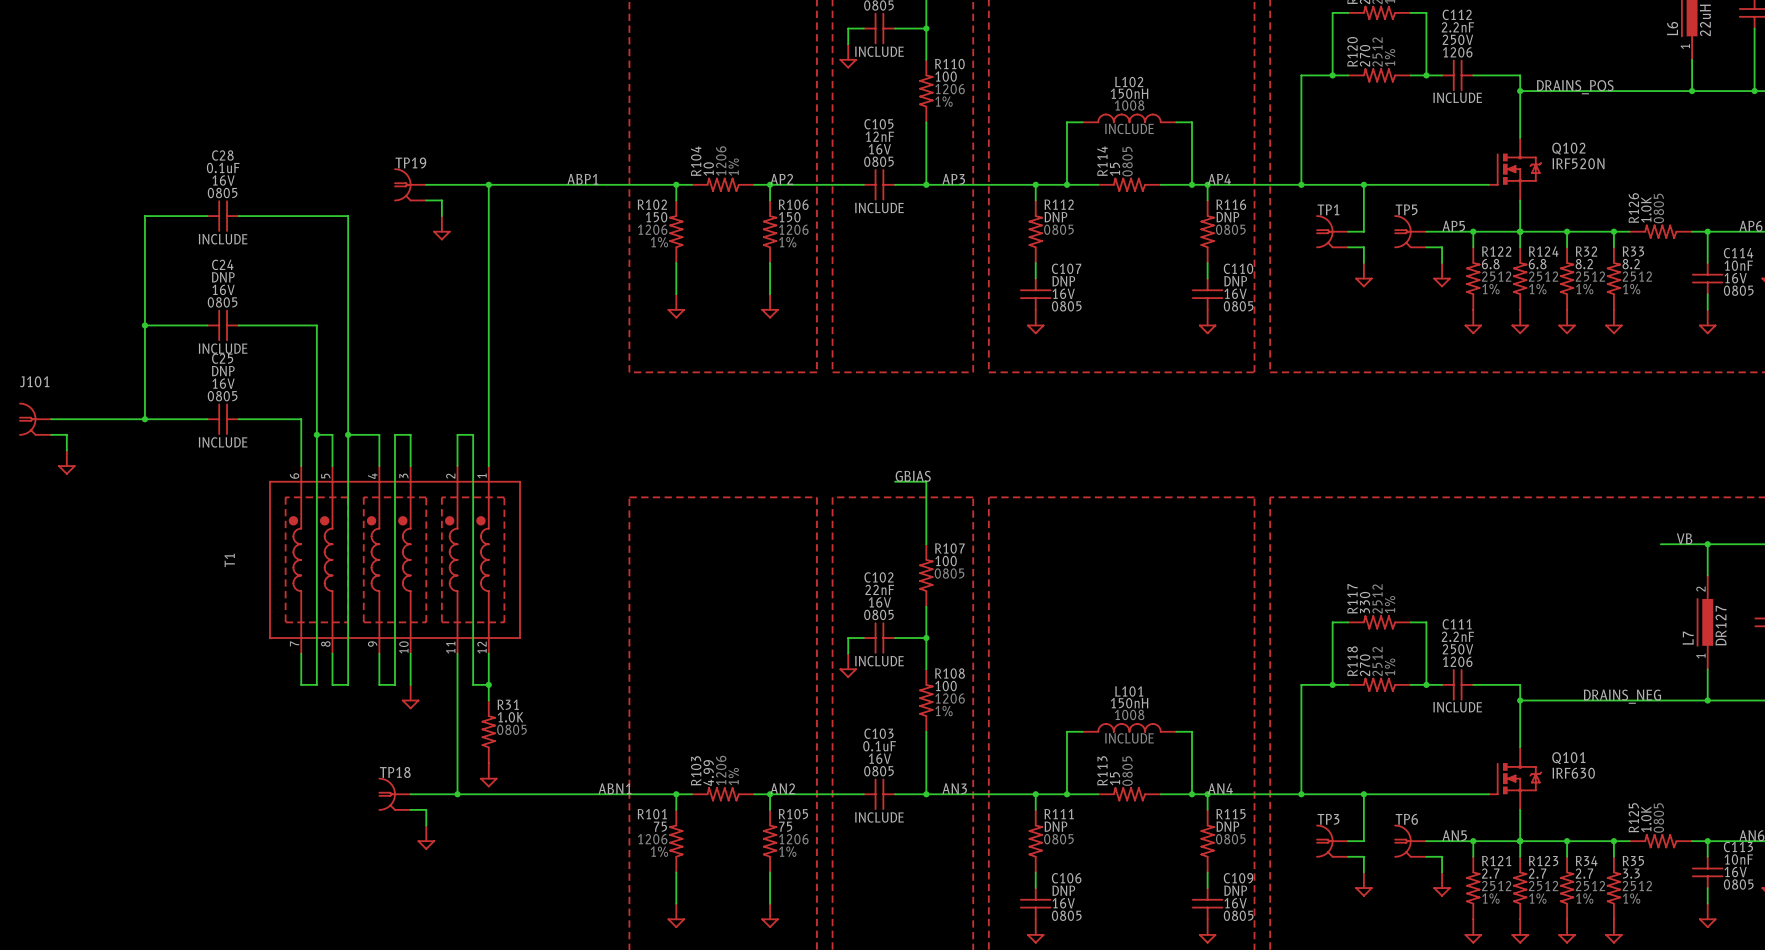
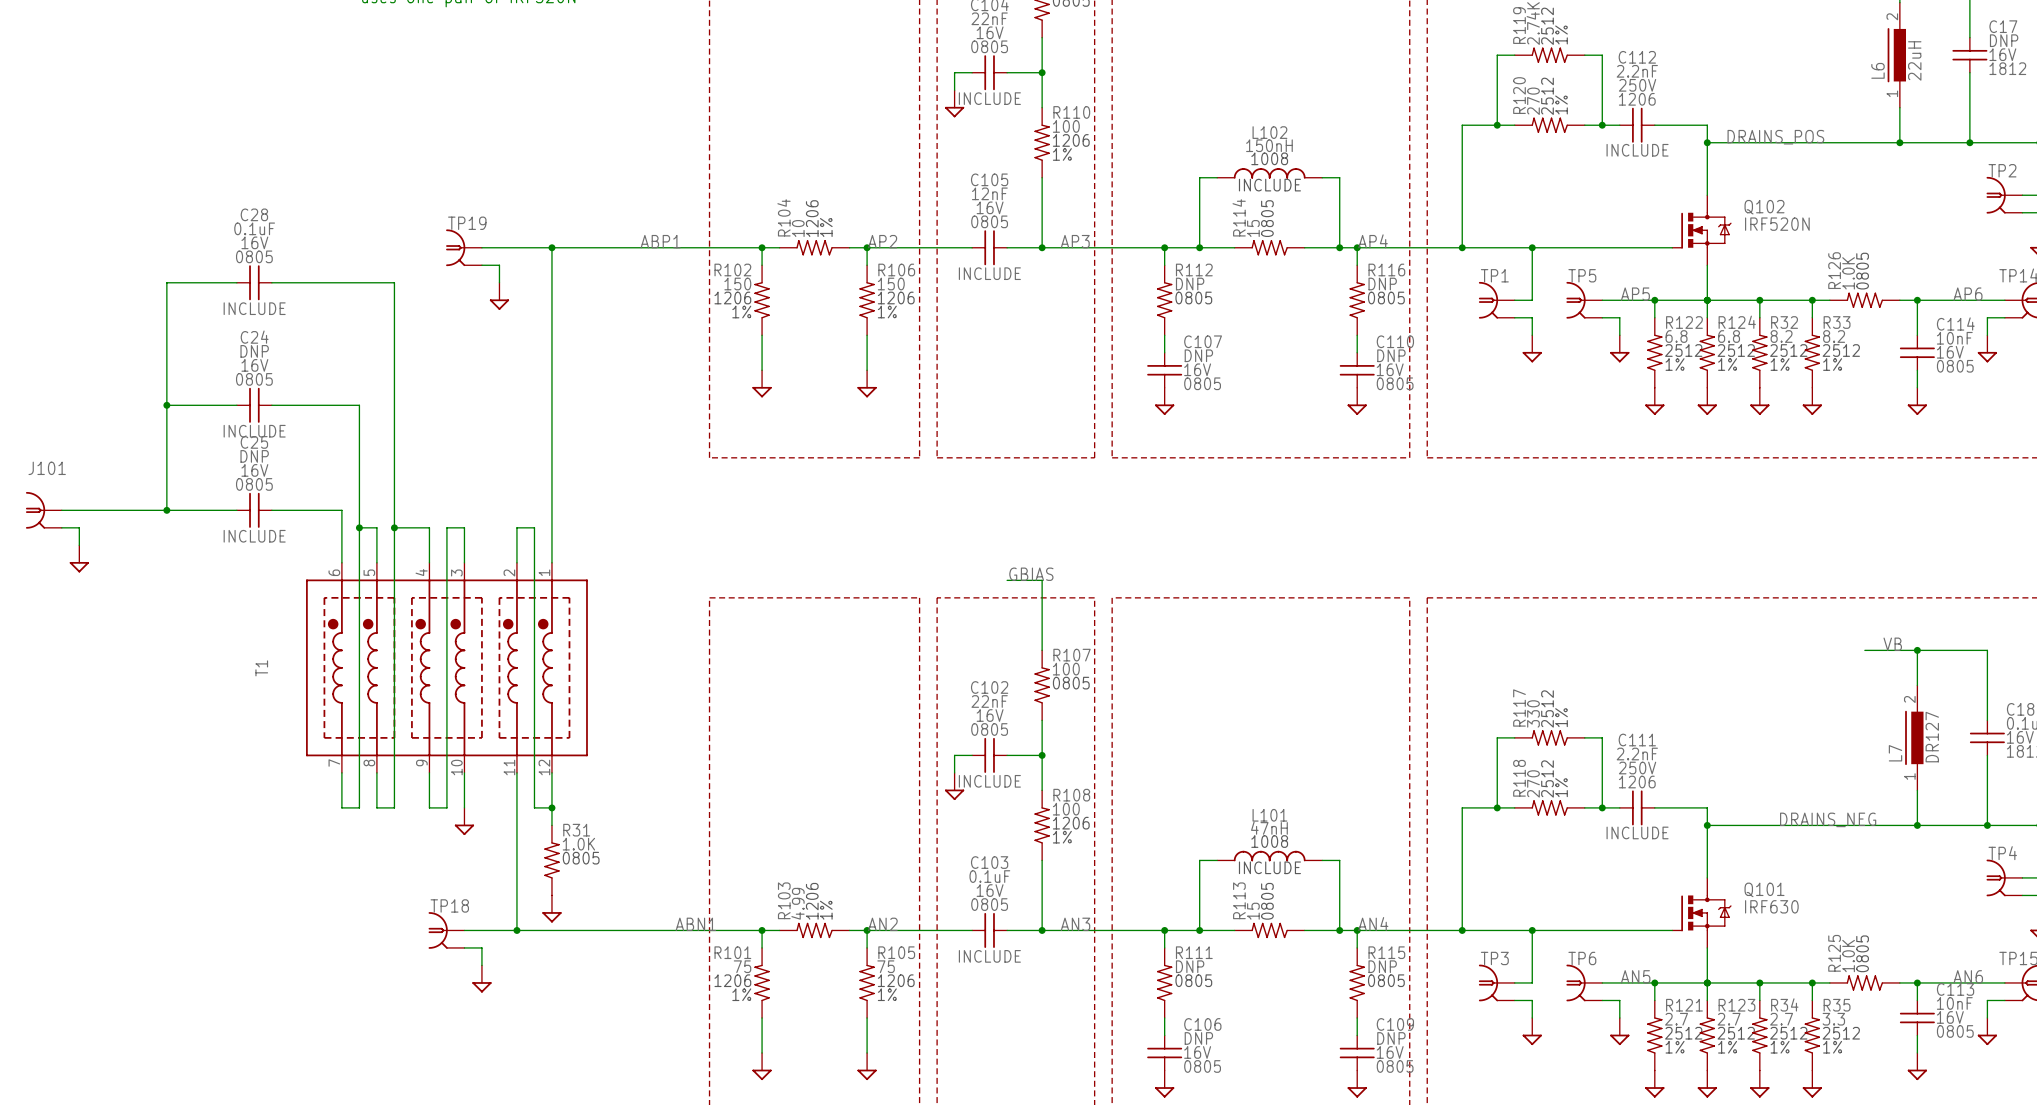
L101 value: 150nH (1129, 703) -> 47nH (1269, 828)

